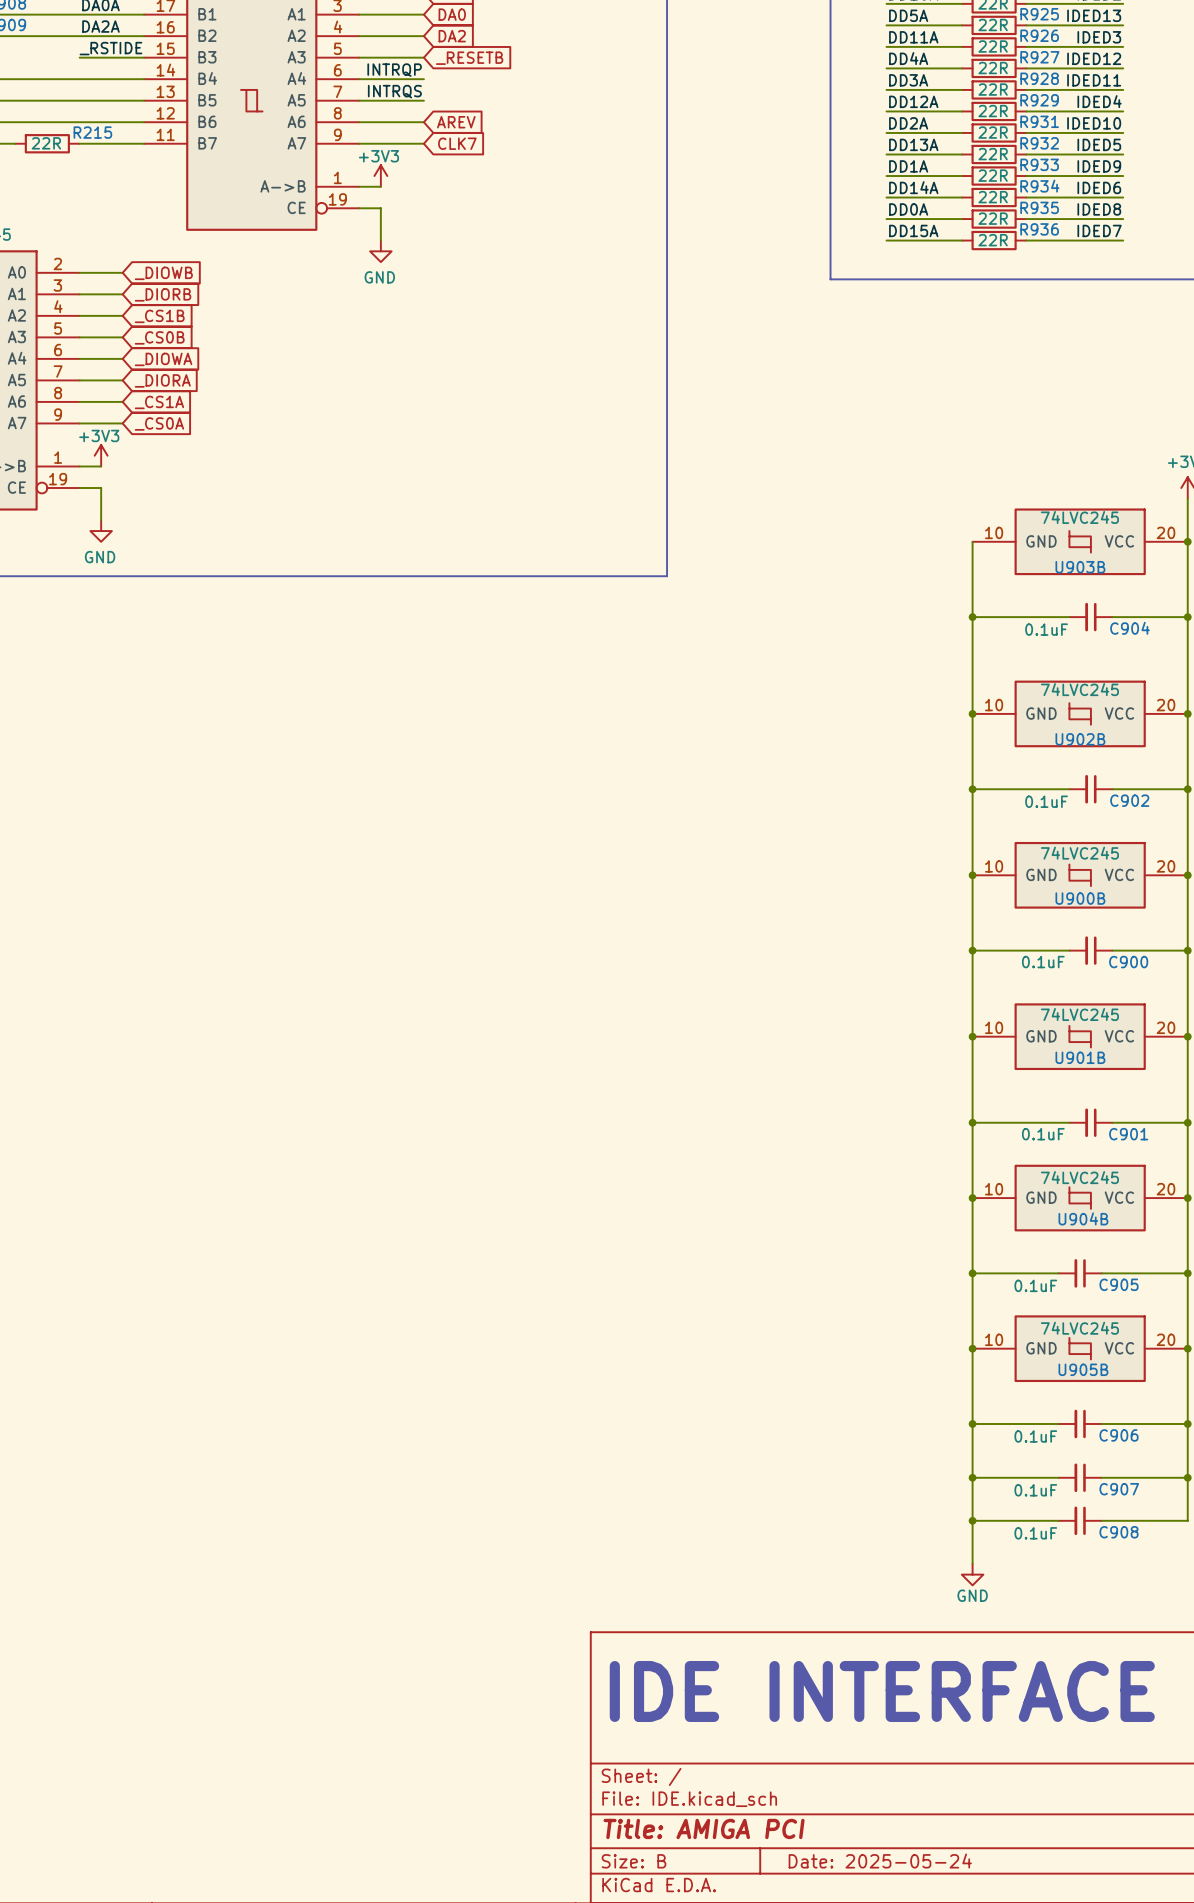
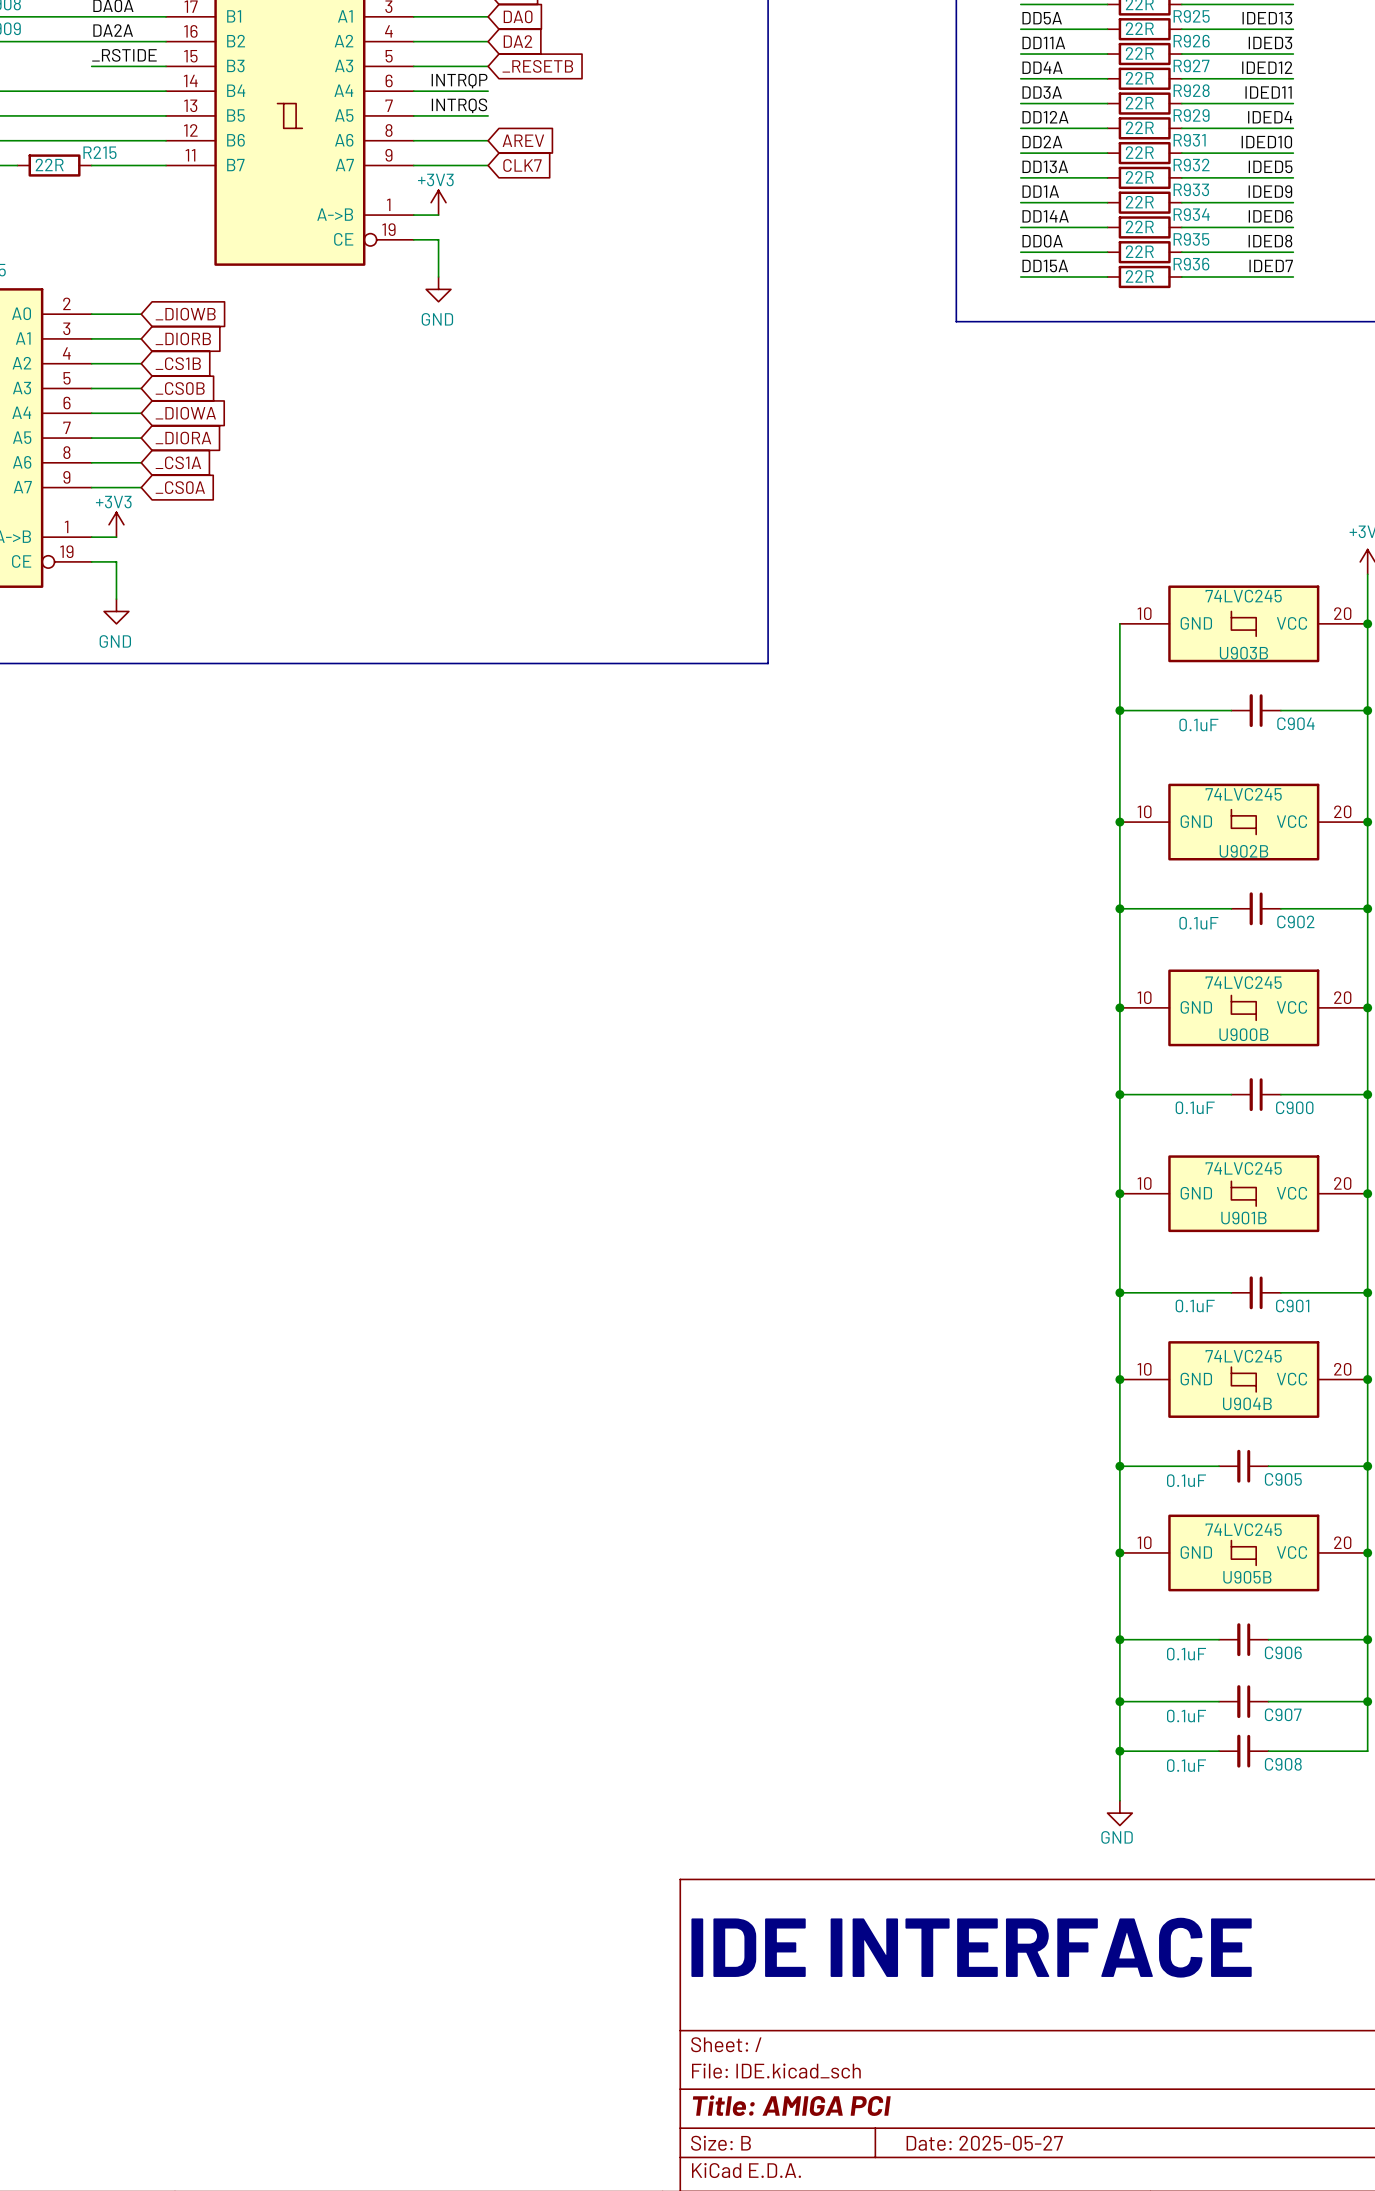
title block: Date: 2025-05-24 (880, 1861) -> Date: 2025-05-27 (984, 2143)

